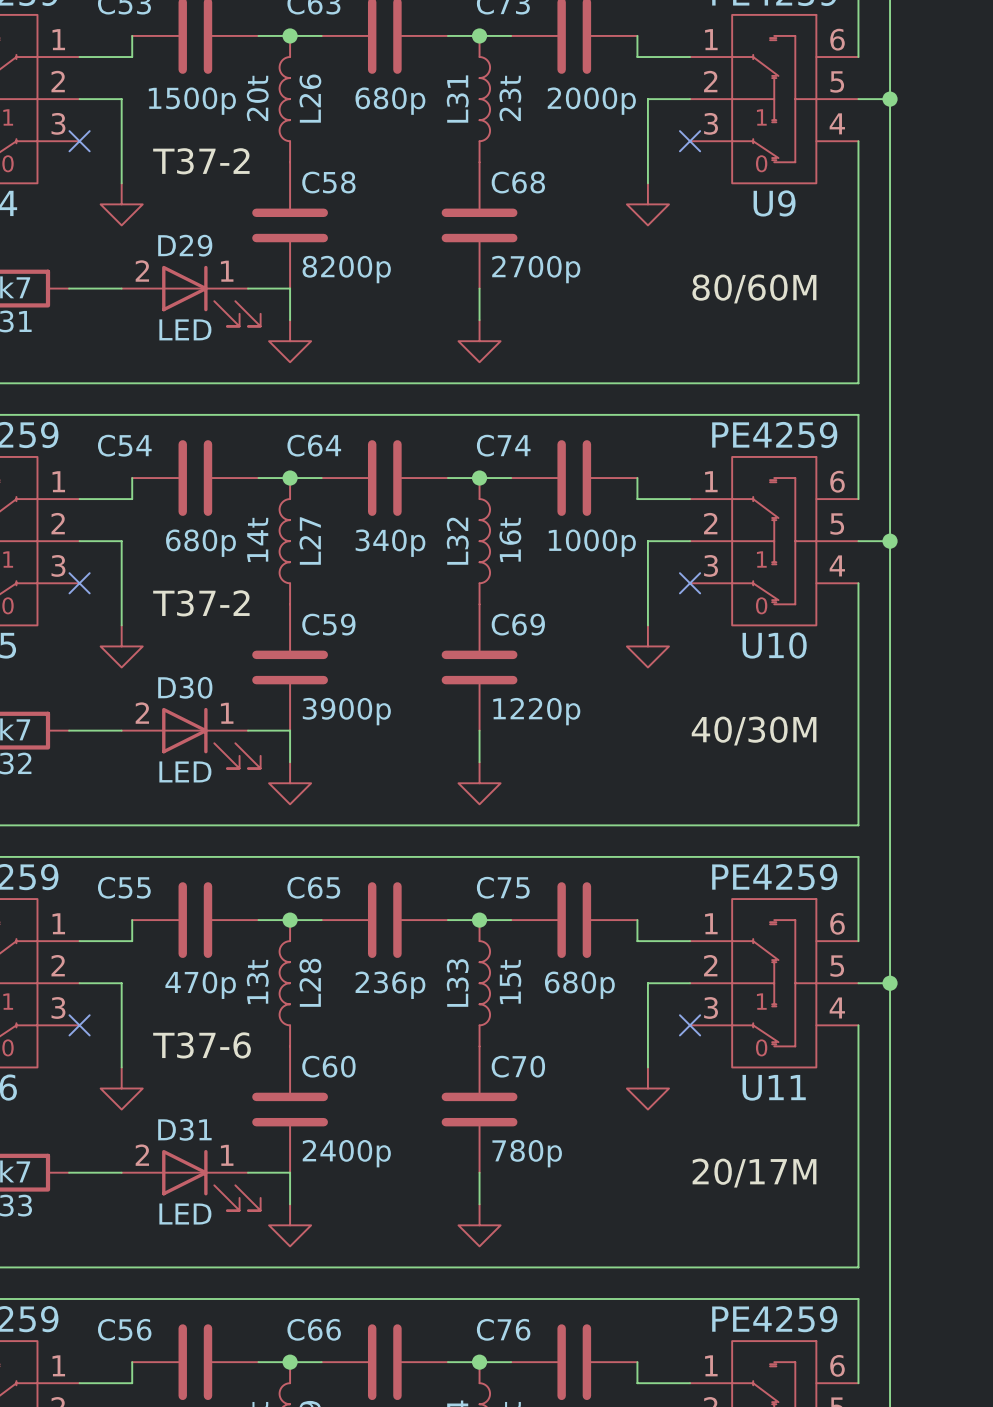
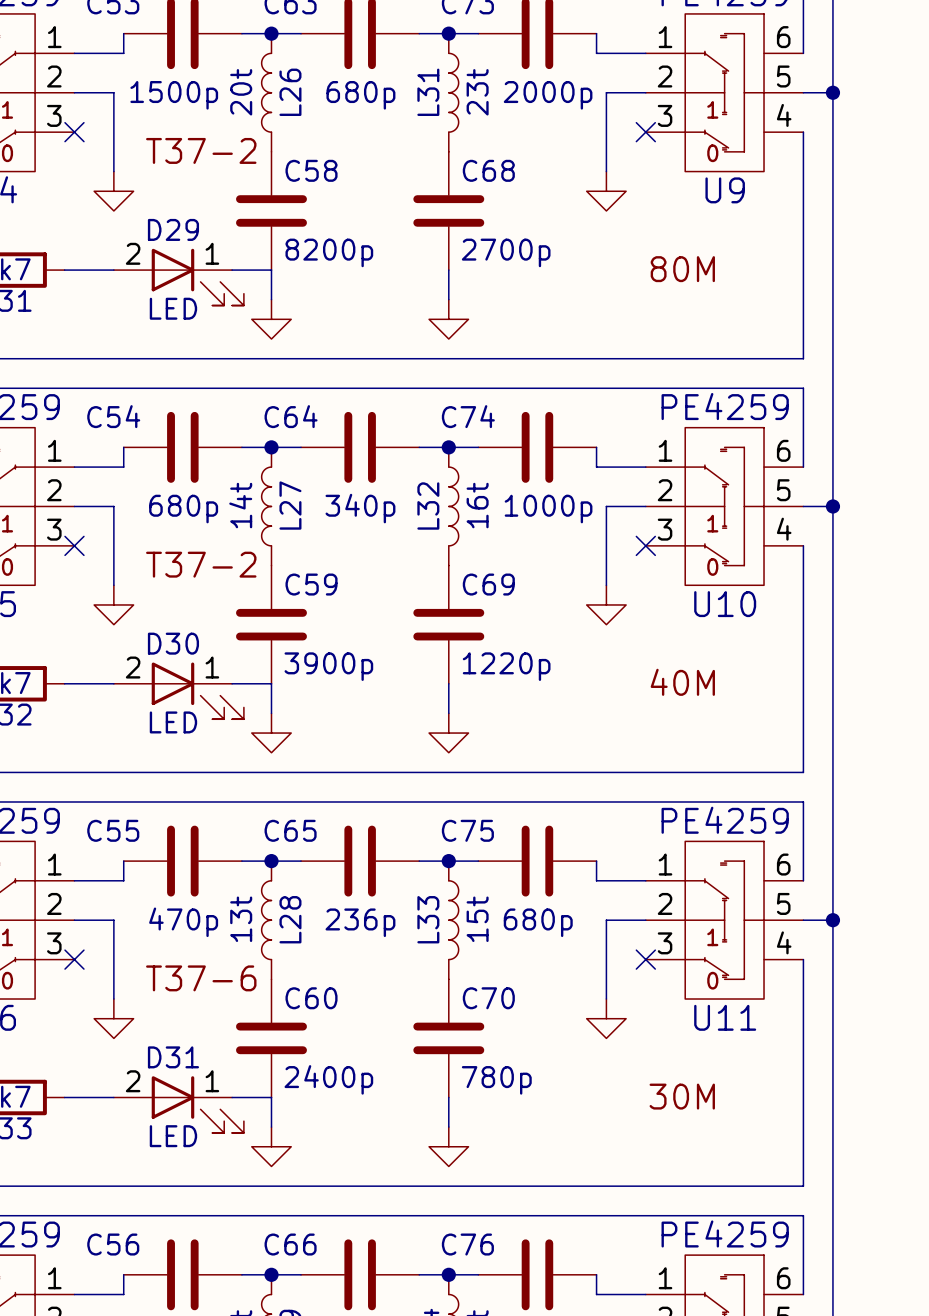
label: 80/60M (754, 288) -> 80M (682, 269)
label: 40/30M (754, 731) -> 40M (682, 682)
label: 20/17M (754, 1173) -> 30M (682, 1096)

